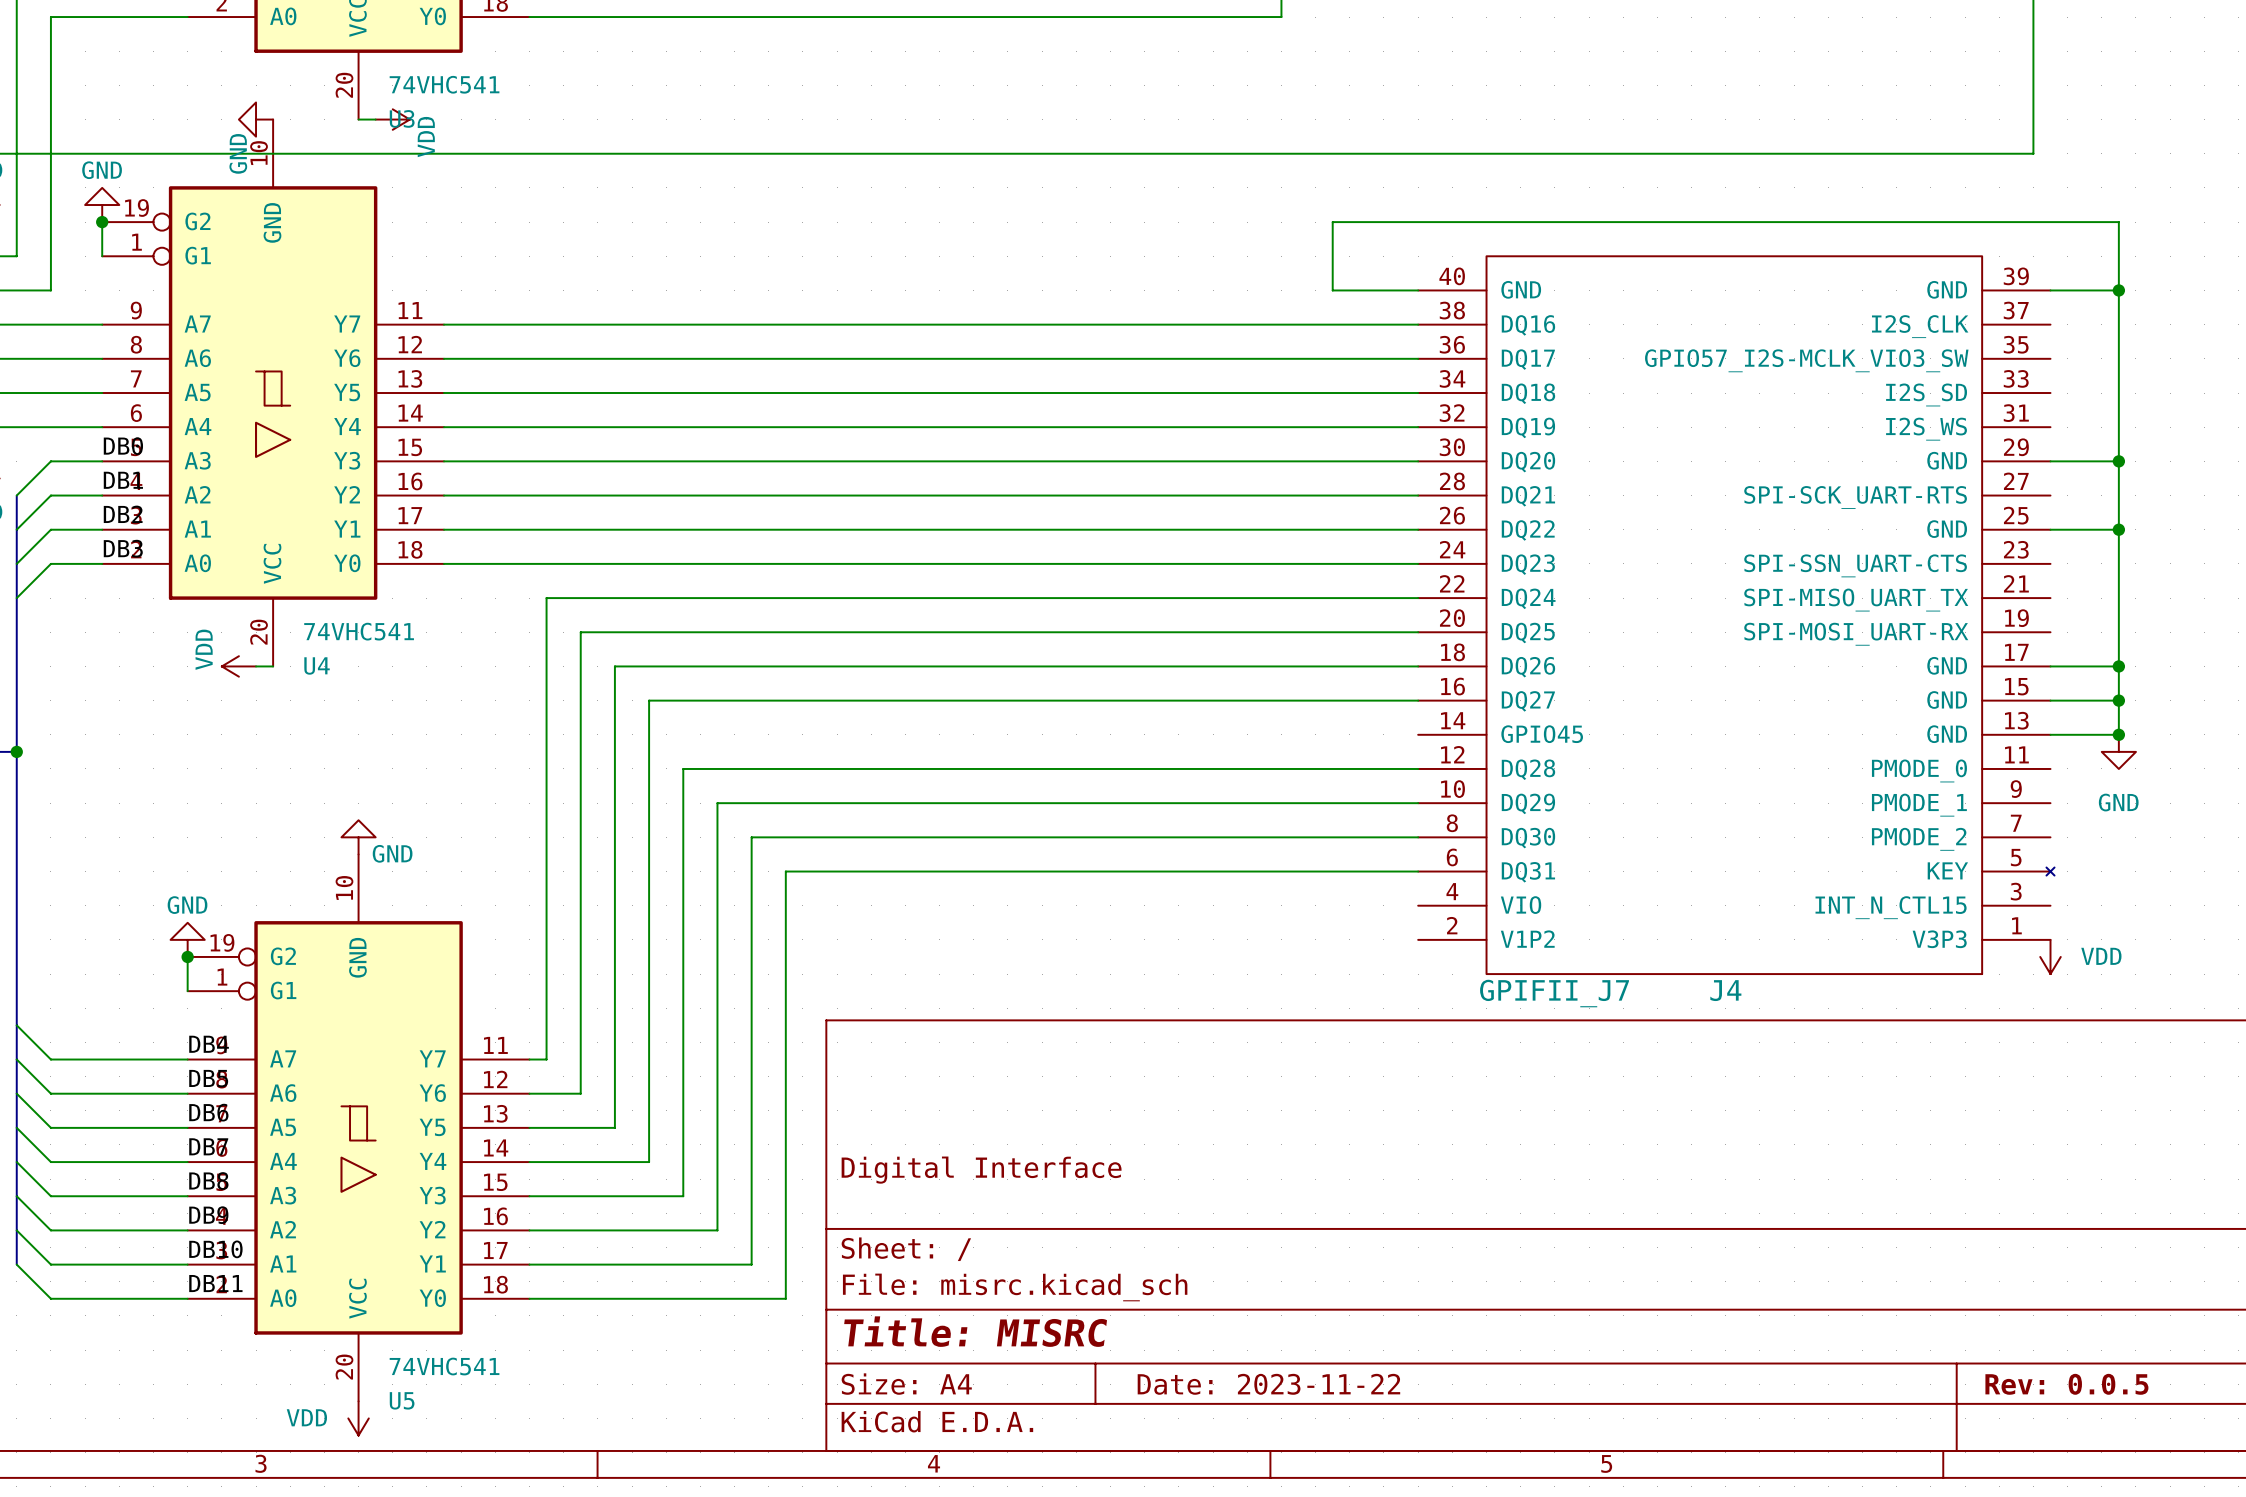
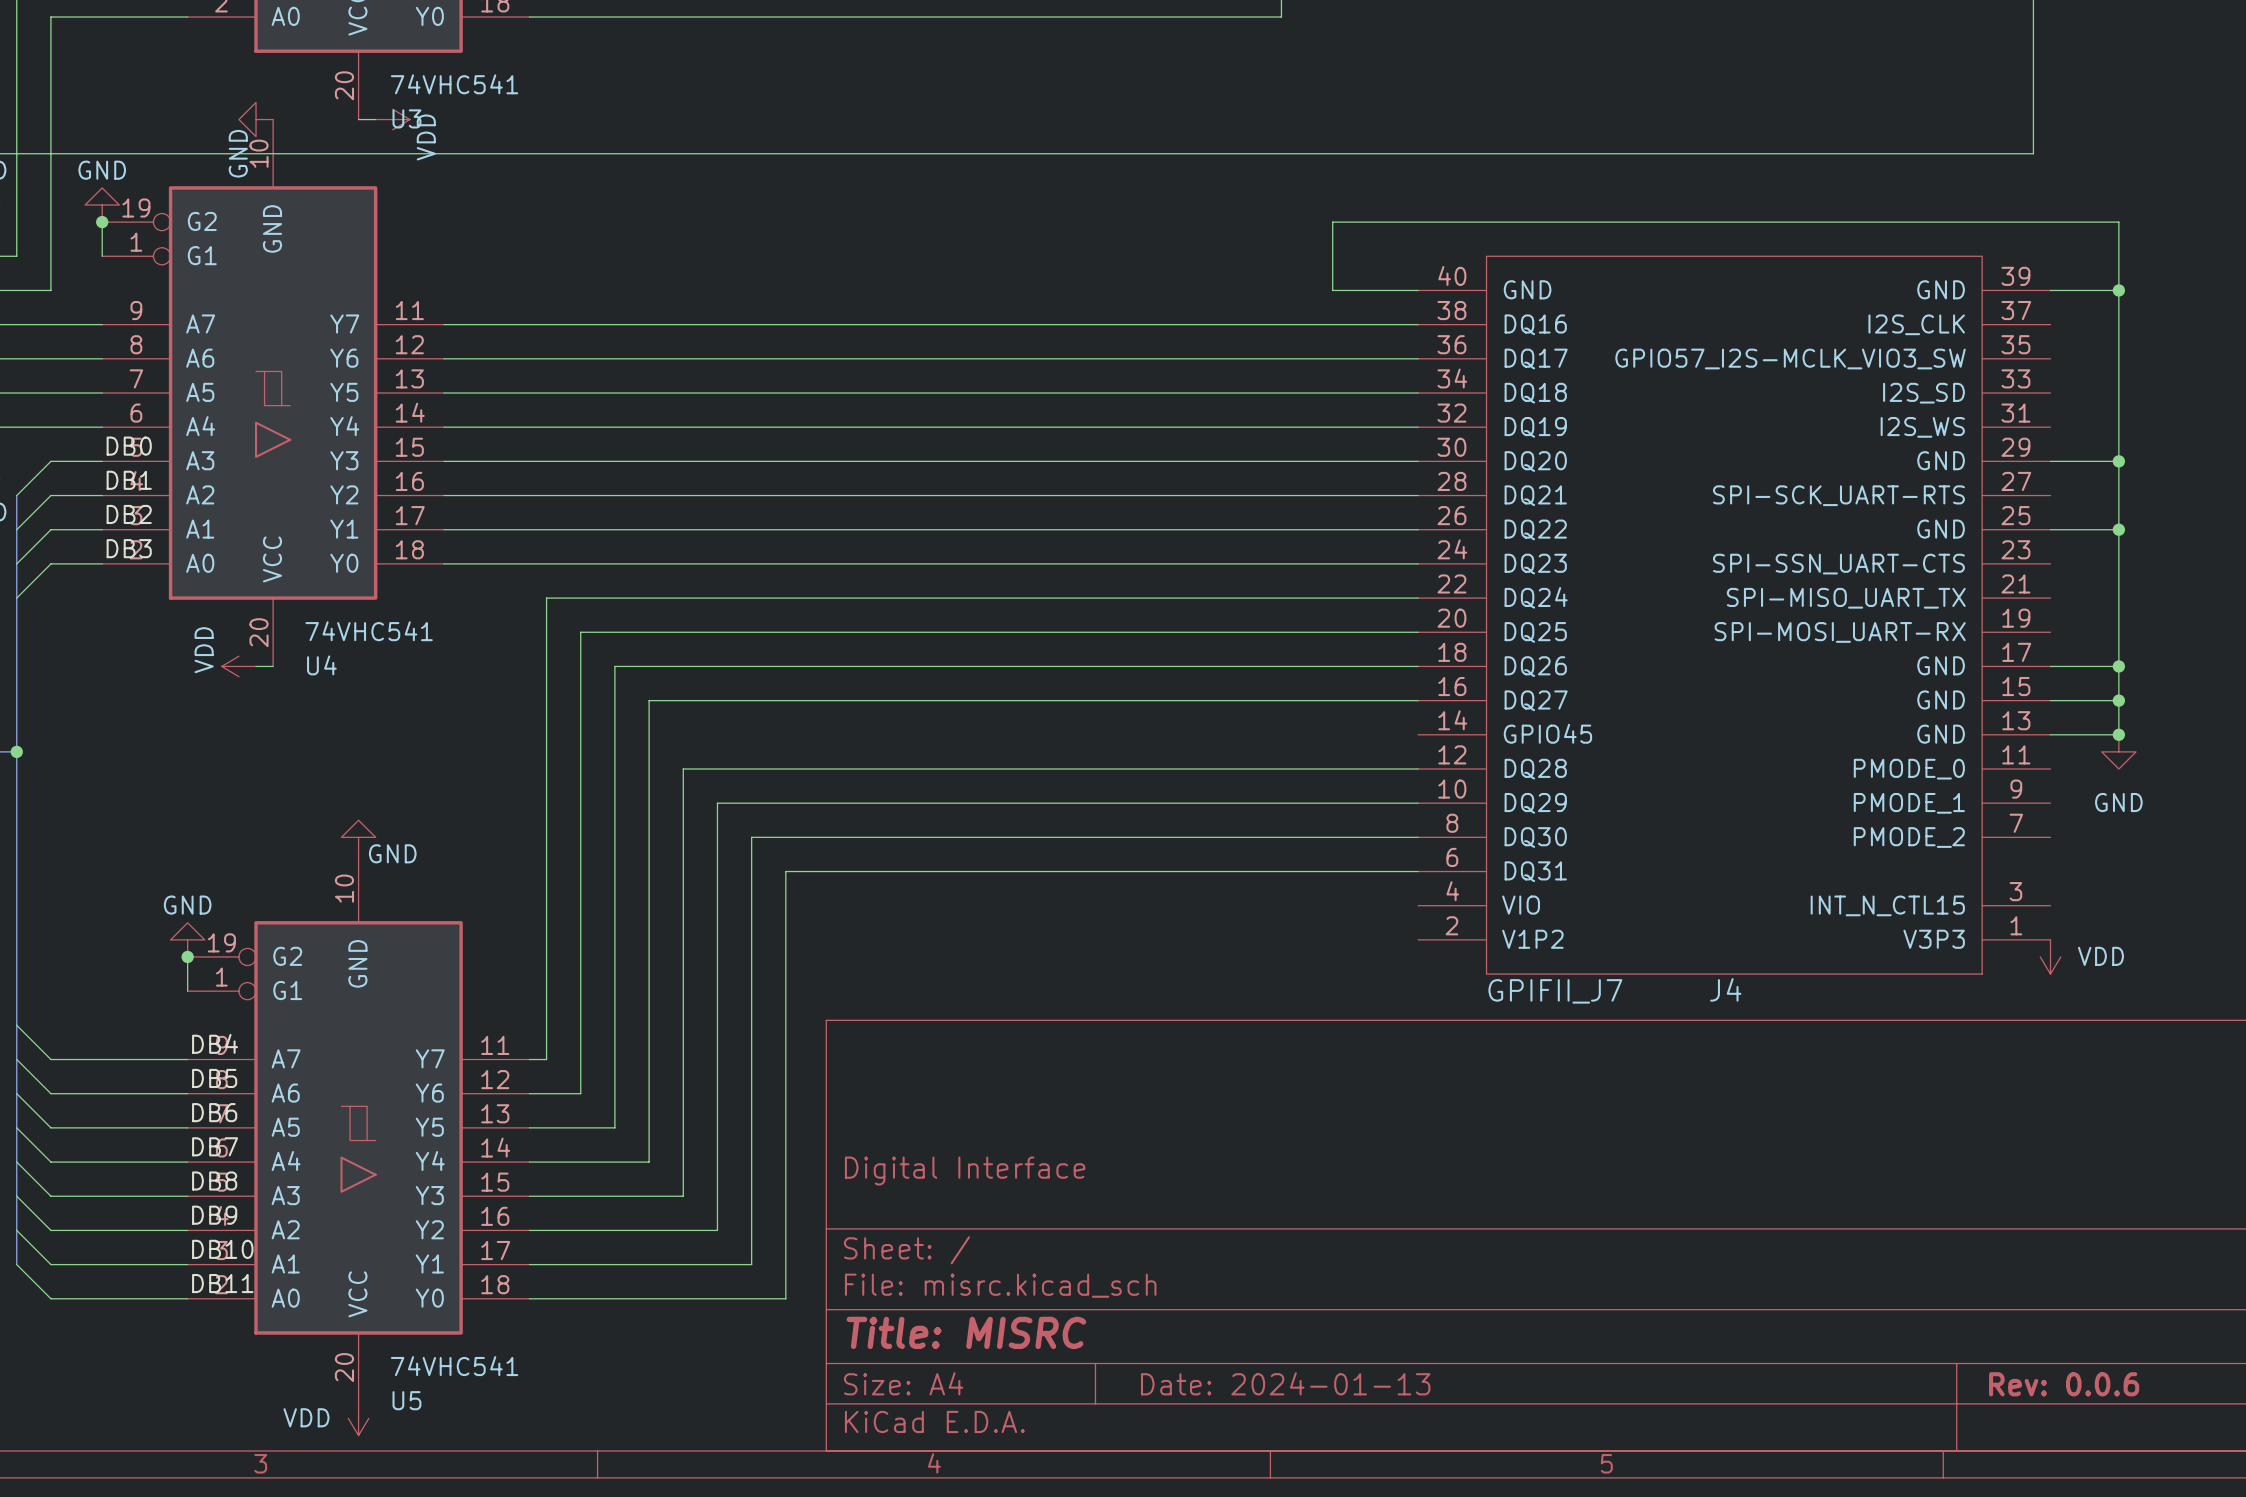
J4 symbol: [1418, 256, 2055, 975] -> [1418, 256, 2051, 975]
title block: Date: 2023-11-22 (1268, 1384) -> Date: 2024-01-13 (1285, 1383)
title block: Rev: 0.0.5 (2066, 1384) -> Rev: 0.0.6 (2064, 1384)

